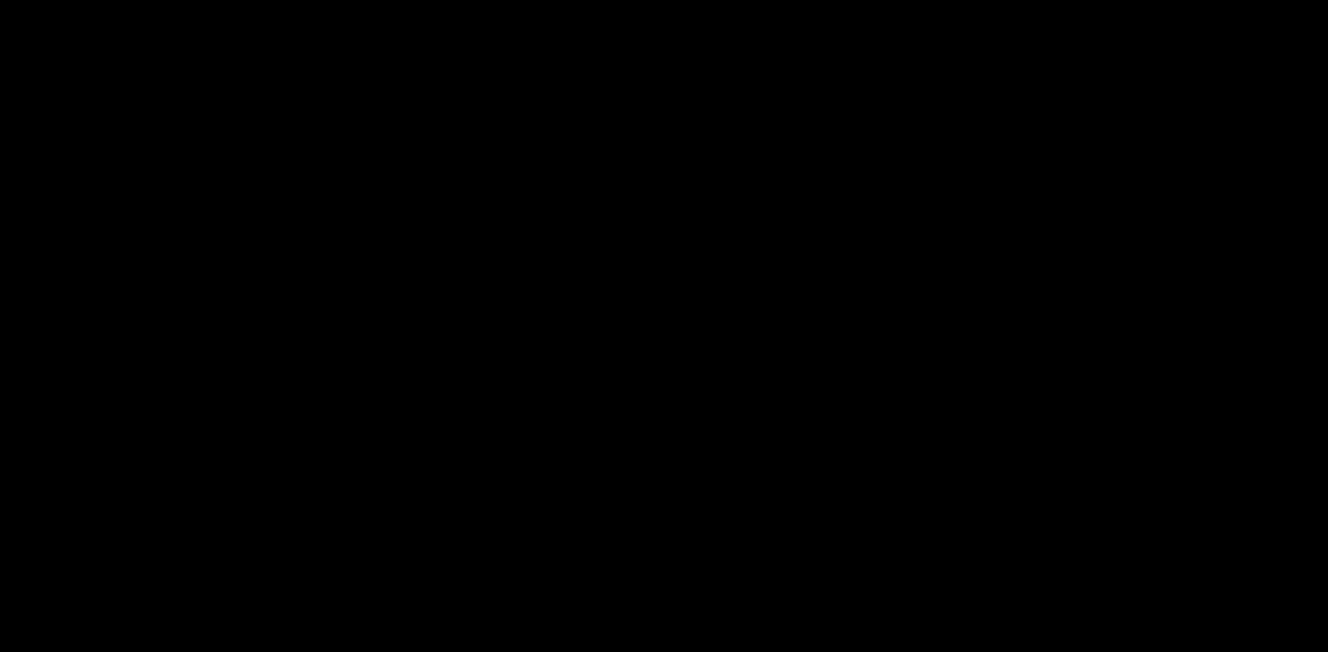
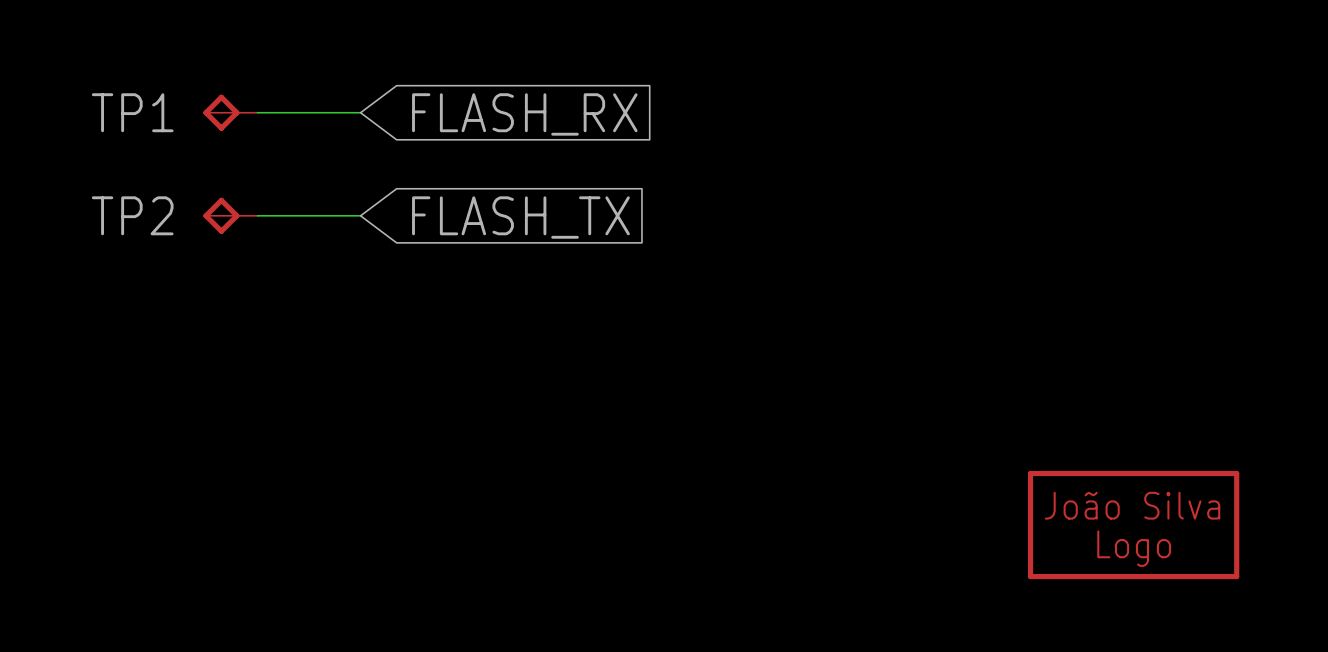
TP1: none -> (230, 112)
wire: none -> (257, 112) (360, 112)
global label: none -> FLASH_RX (524, 114)
TP2: none -> (230, 215)
wire: none -> (257, 215) (360, 215)
global label: none -> FLASH_TX (520, 217)
part: none -> (1133, 525)

